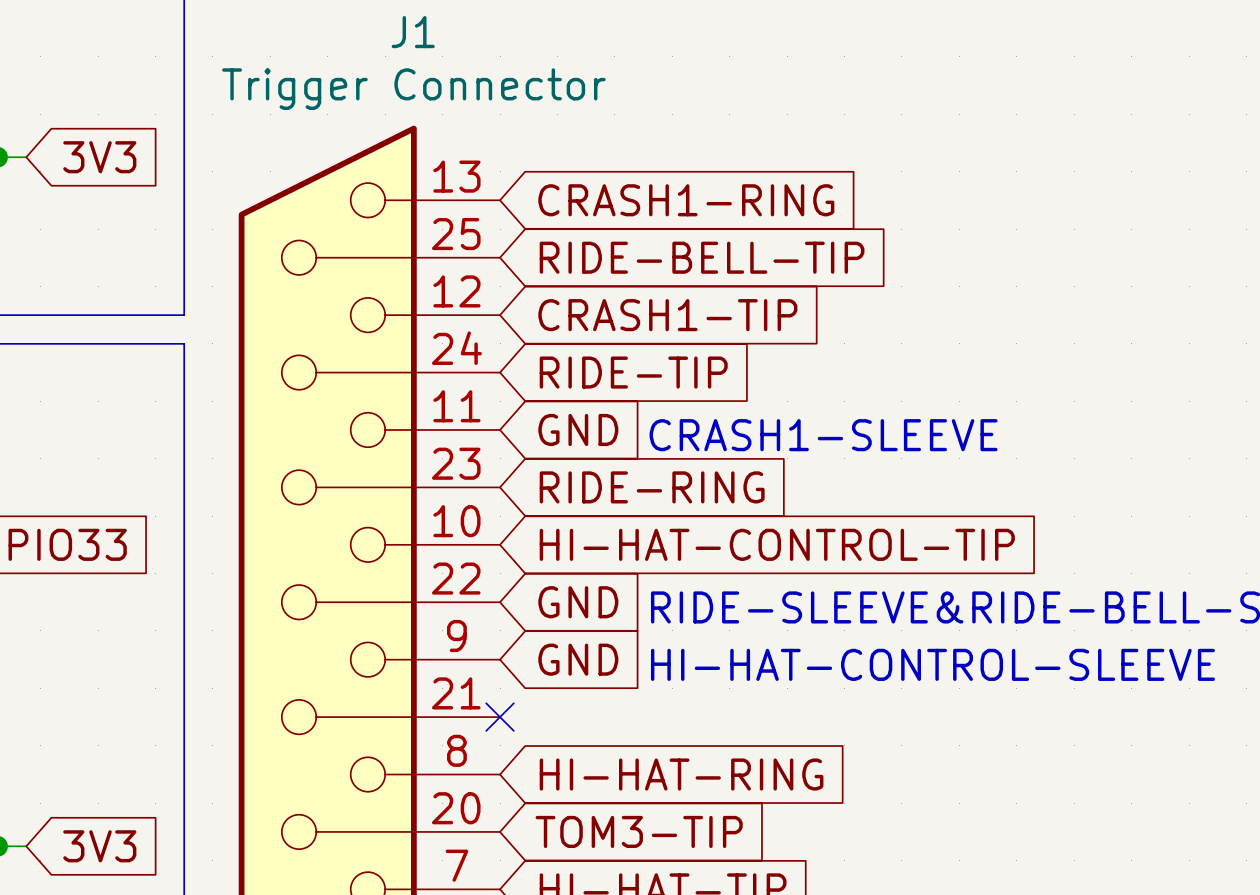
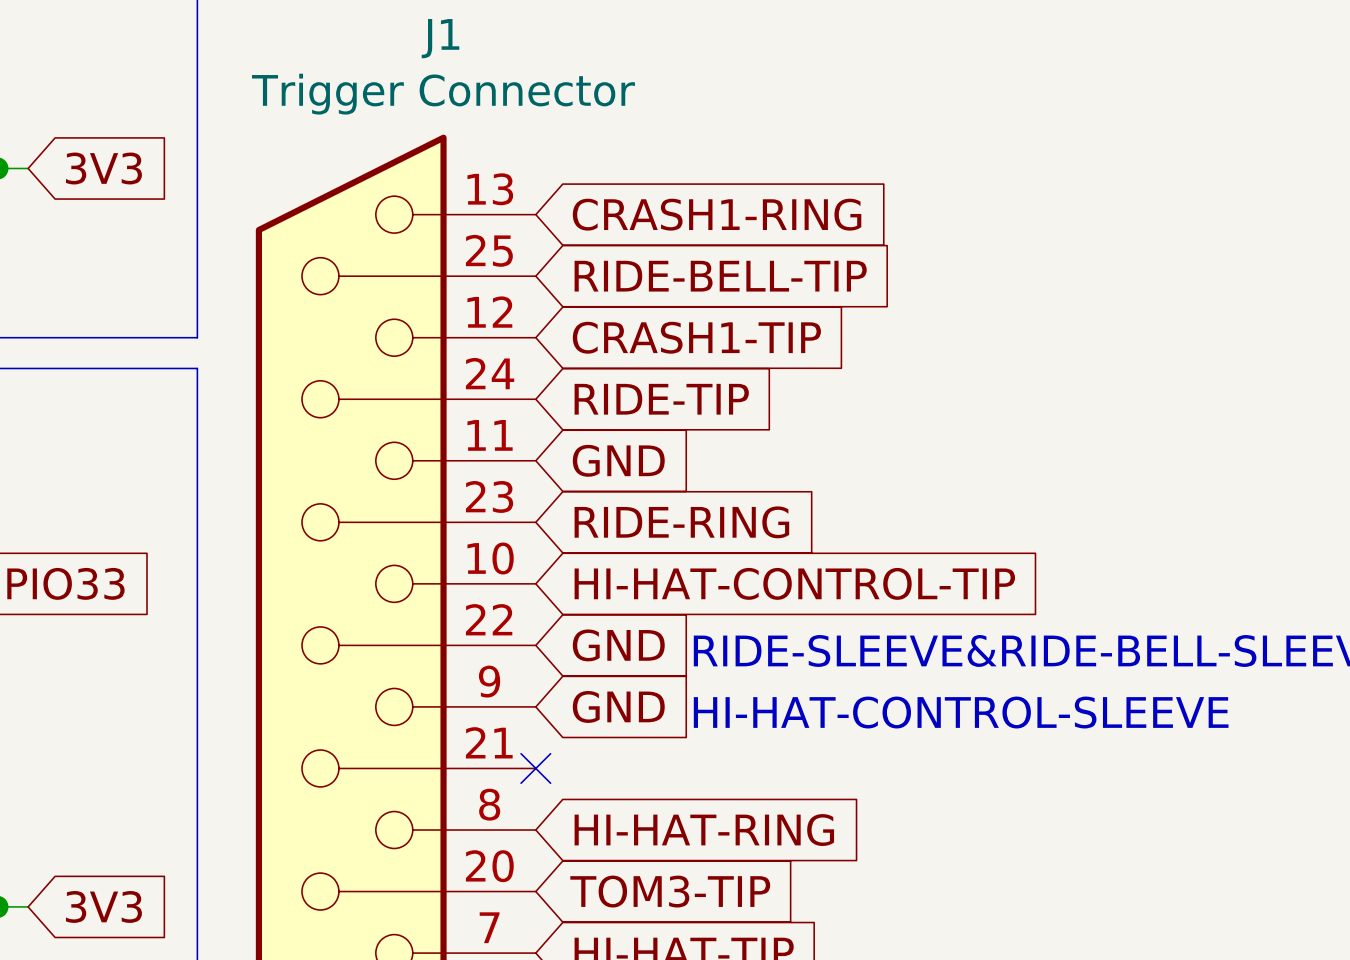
text: CRASH1-SLEEVE (823, 435) -> none

